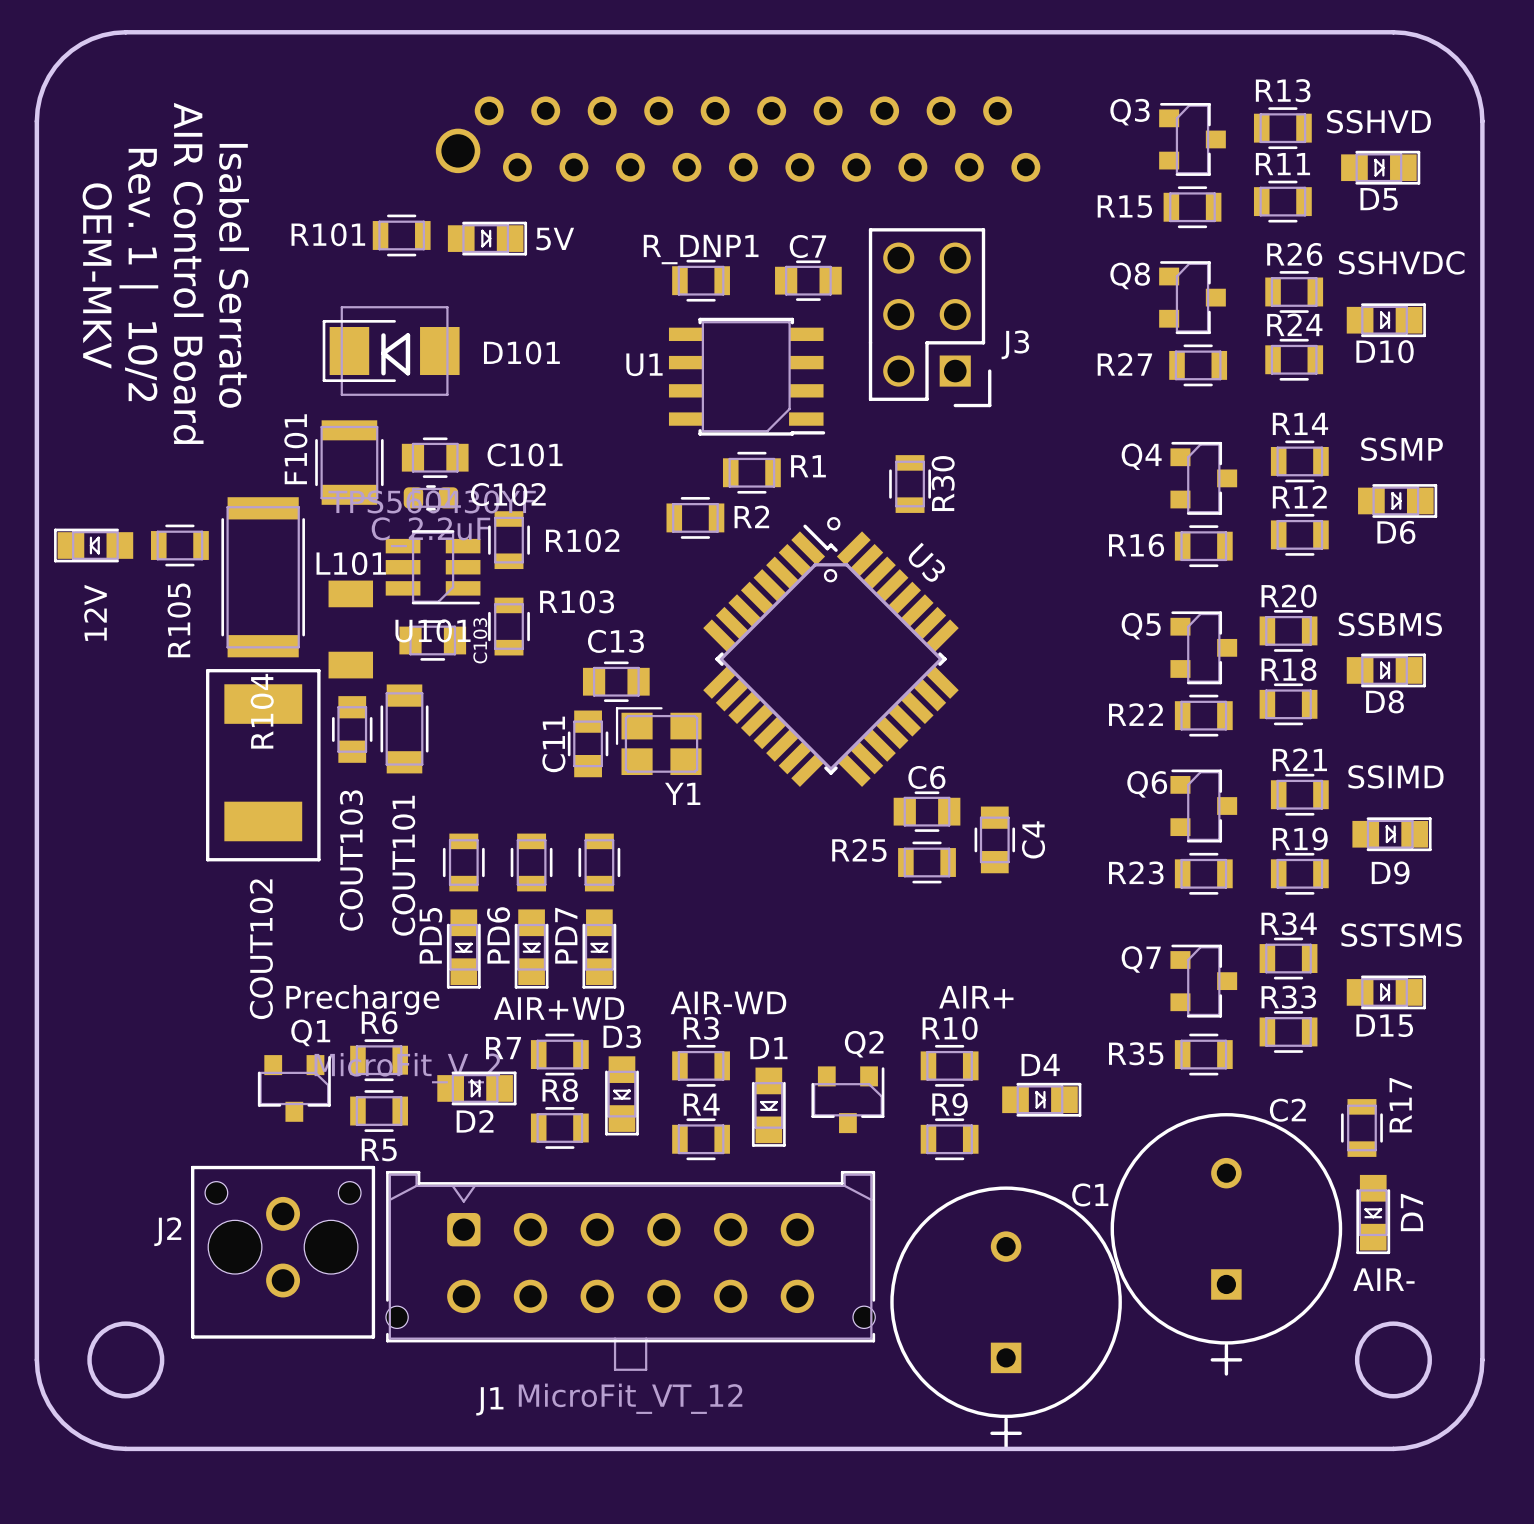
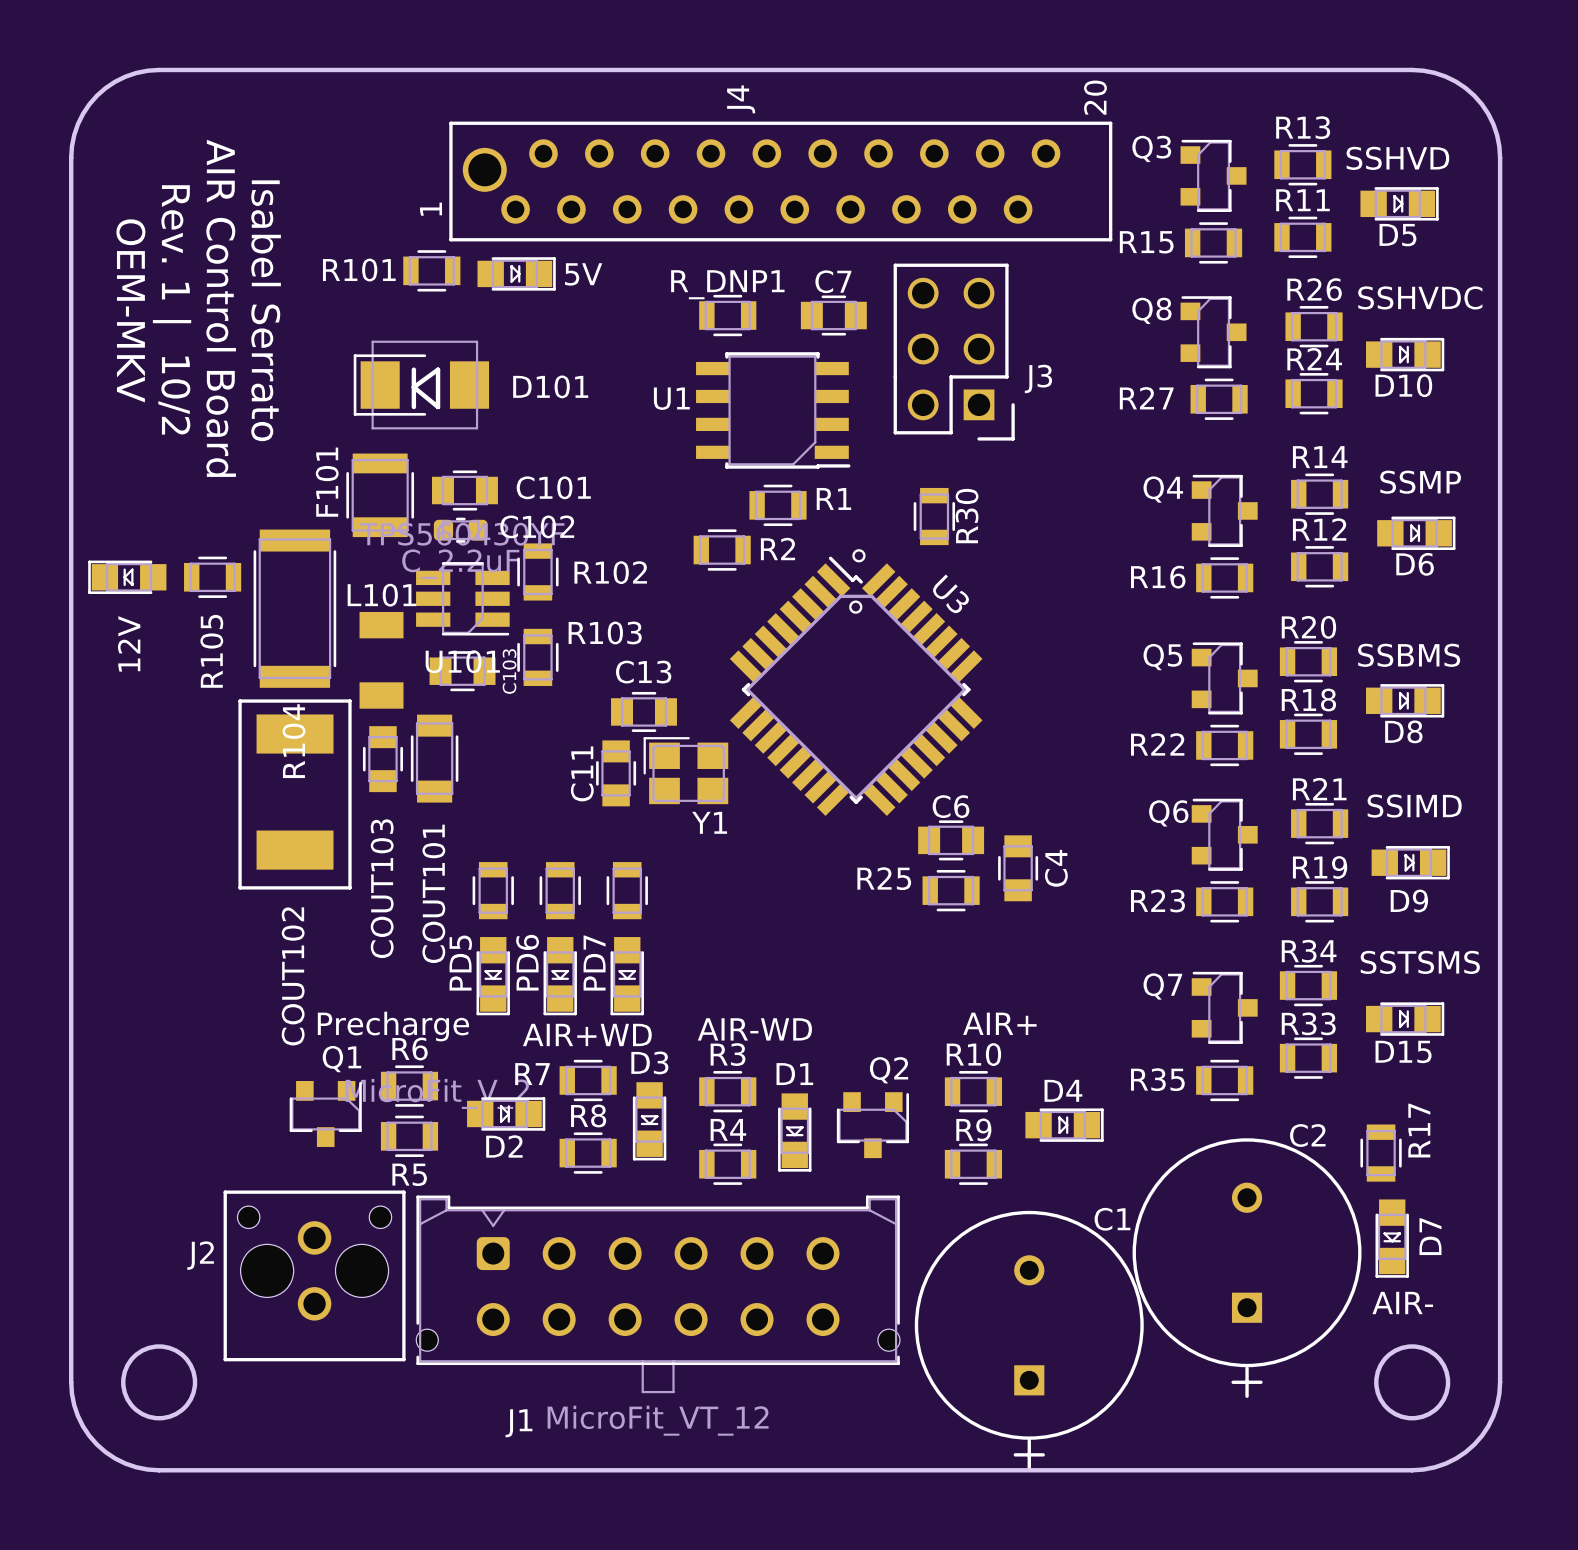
J4 side: bottom (738, 139) -> top (780, 181)

